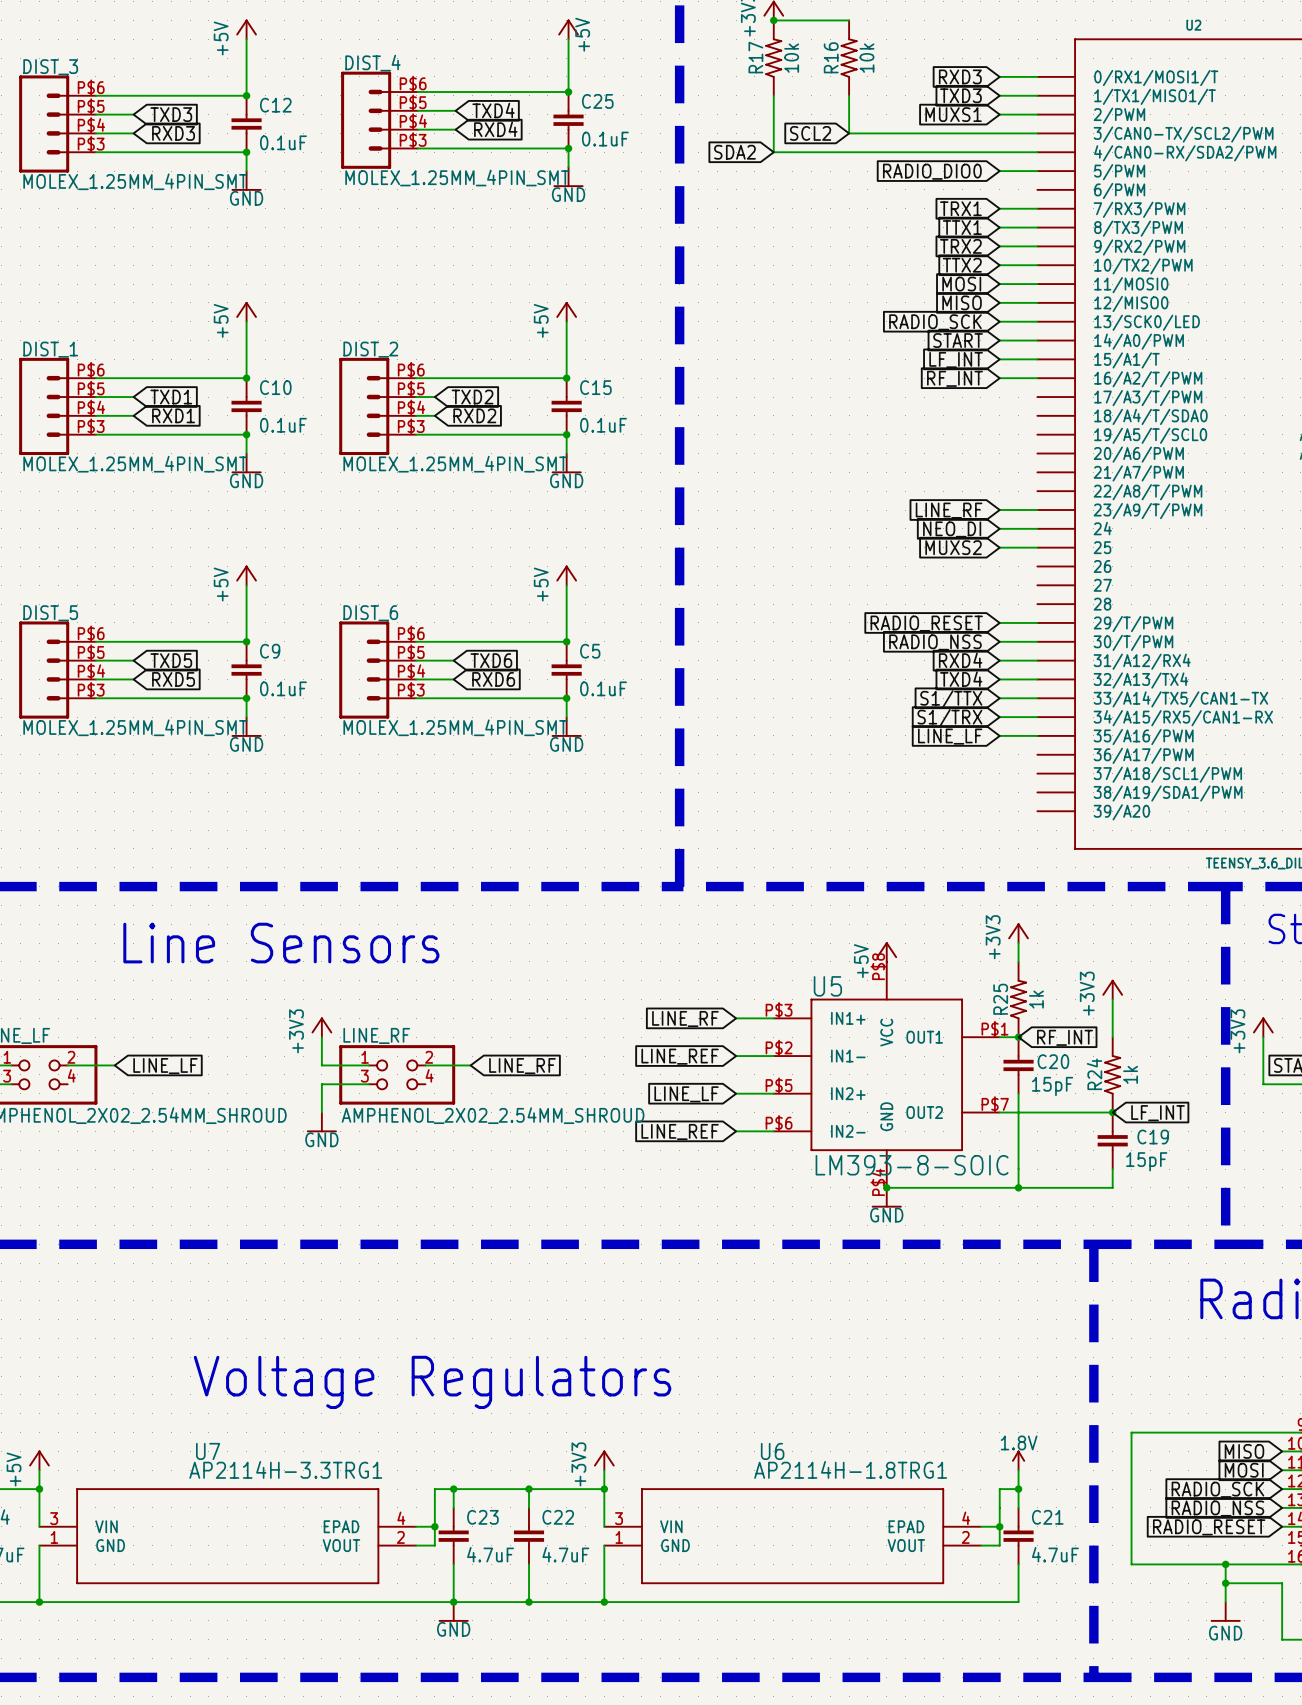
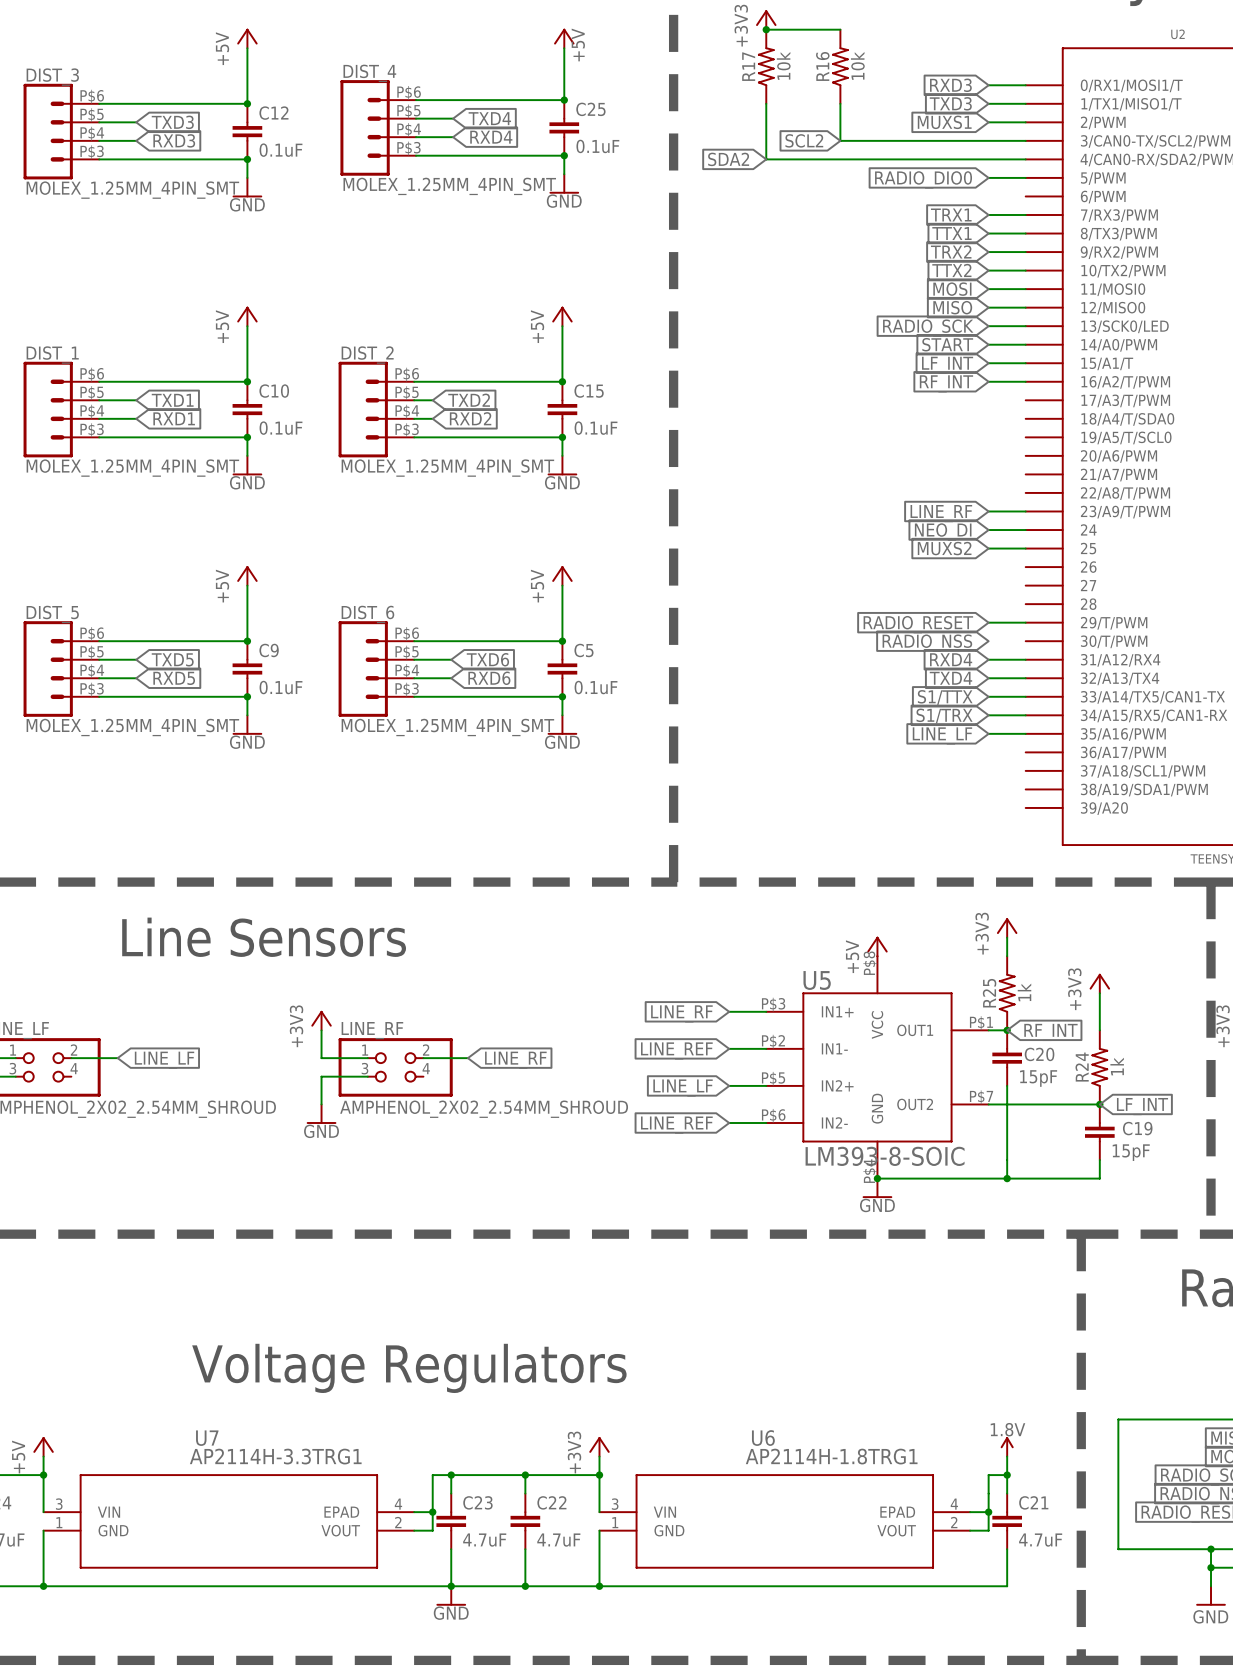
wire: (999, 641) (1037, 641) -> none

